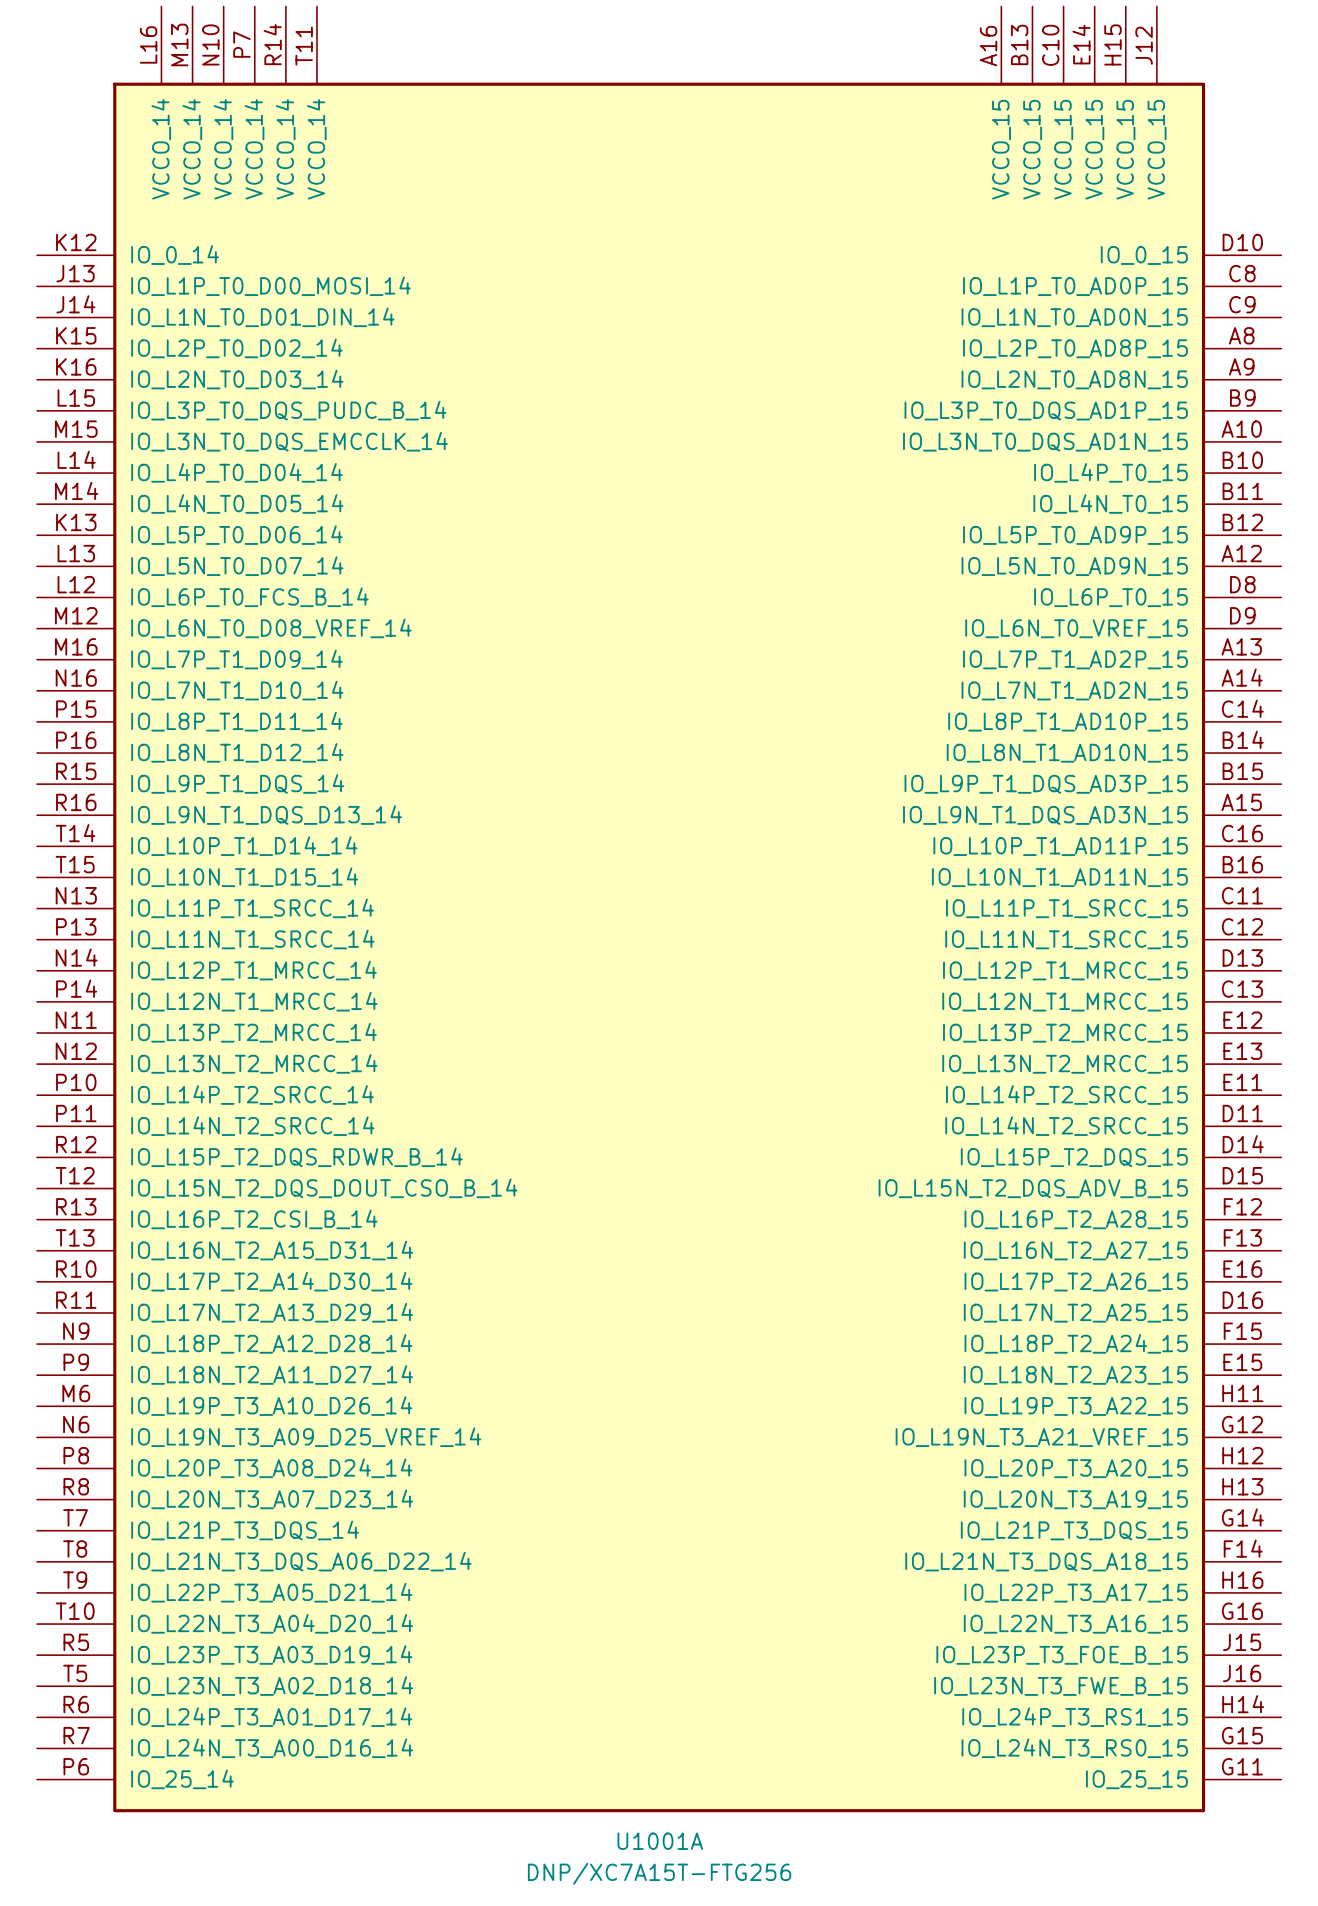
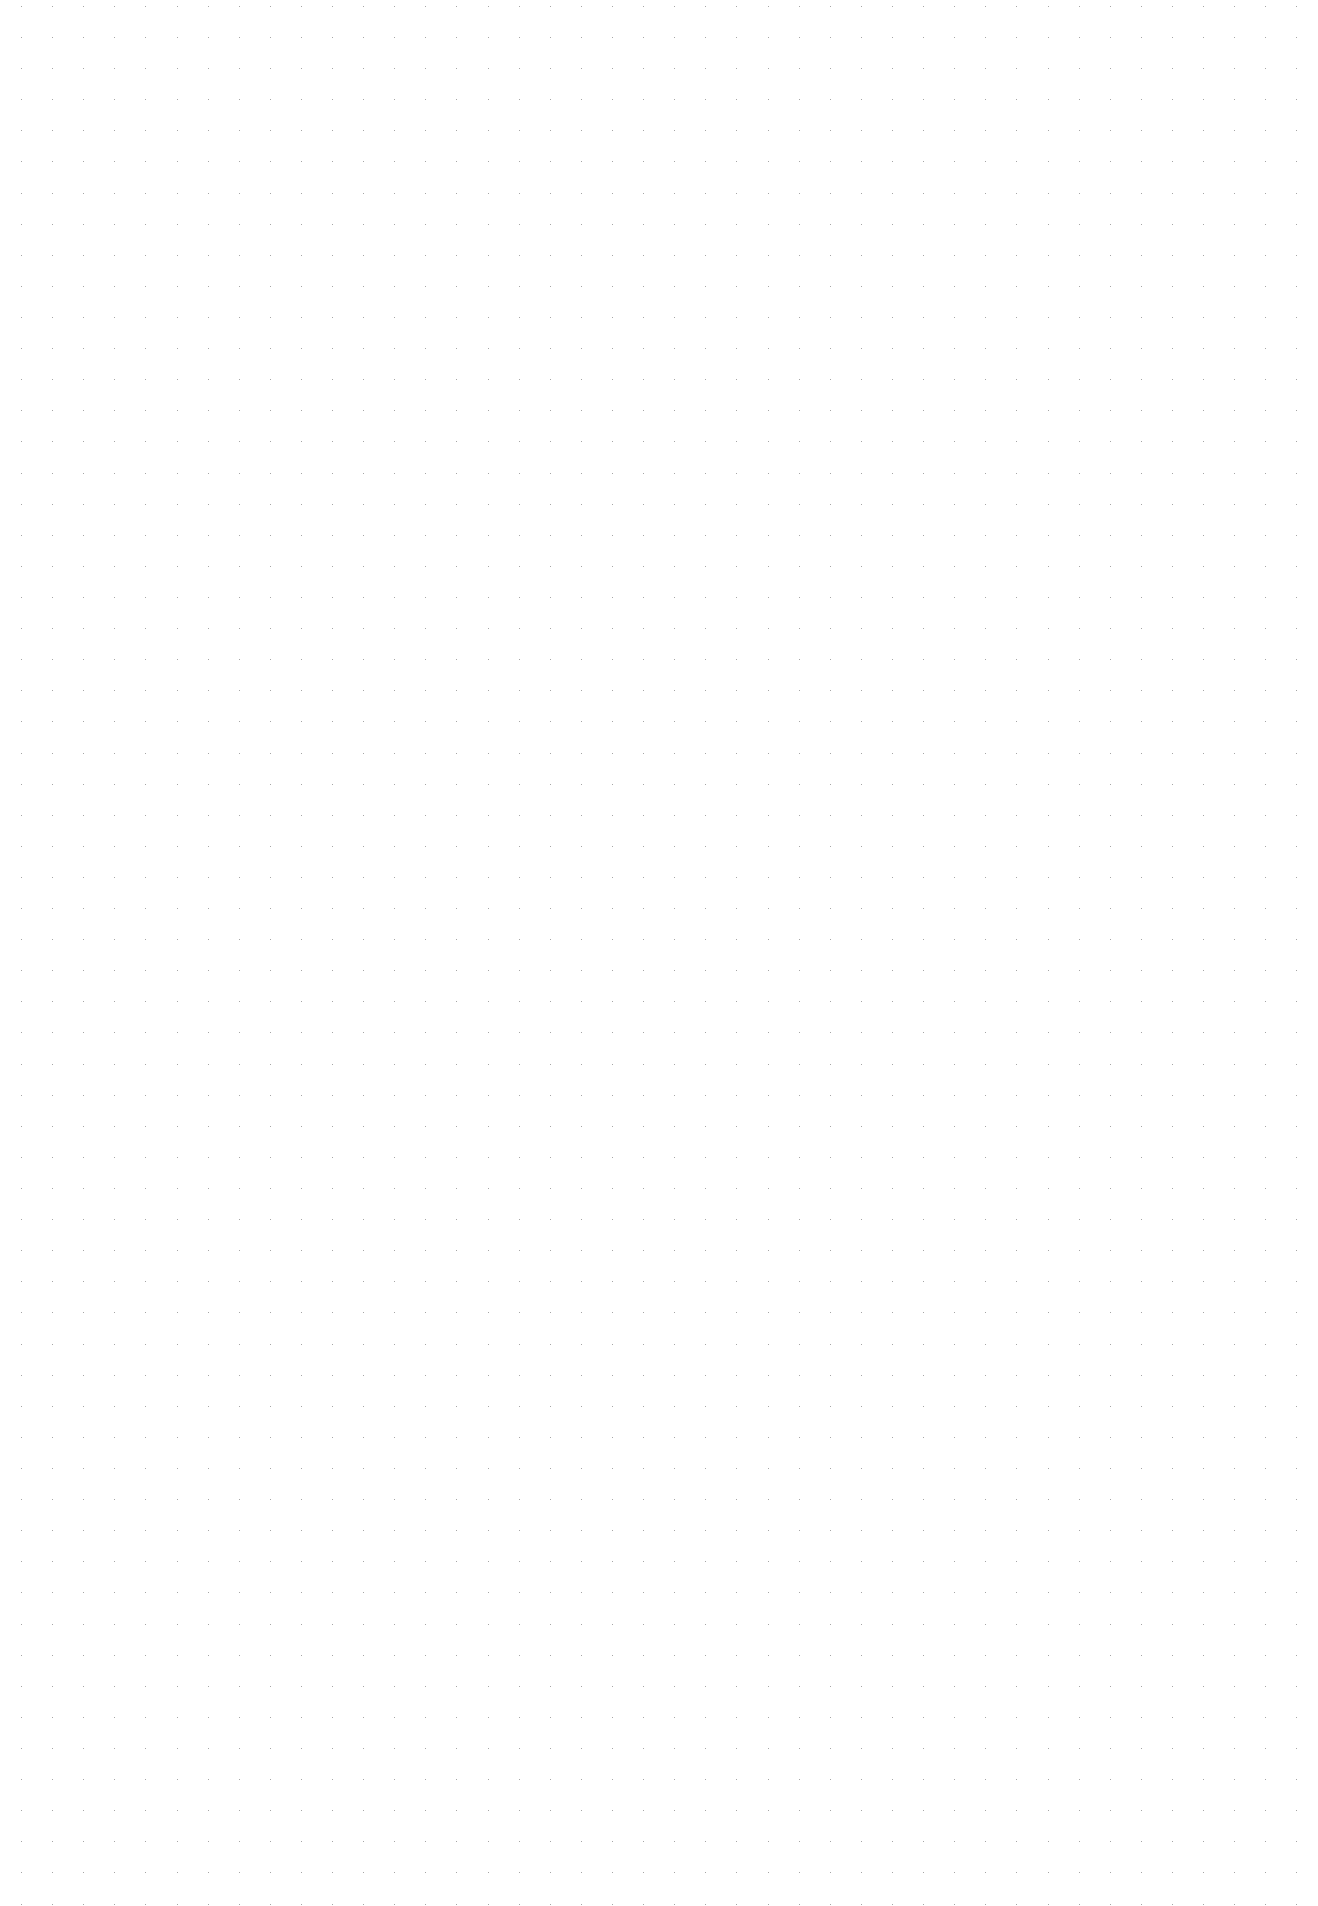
U1001A: DNP/XC7A15T-FTG256 (659, 909) -> none

